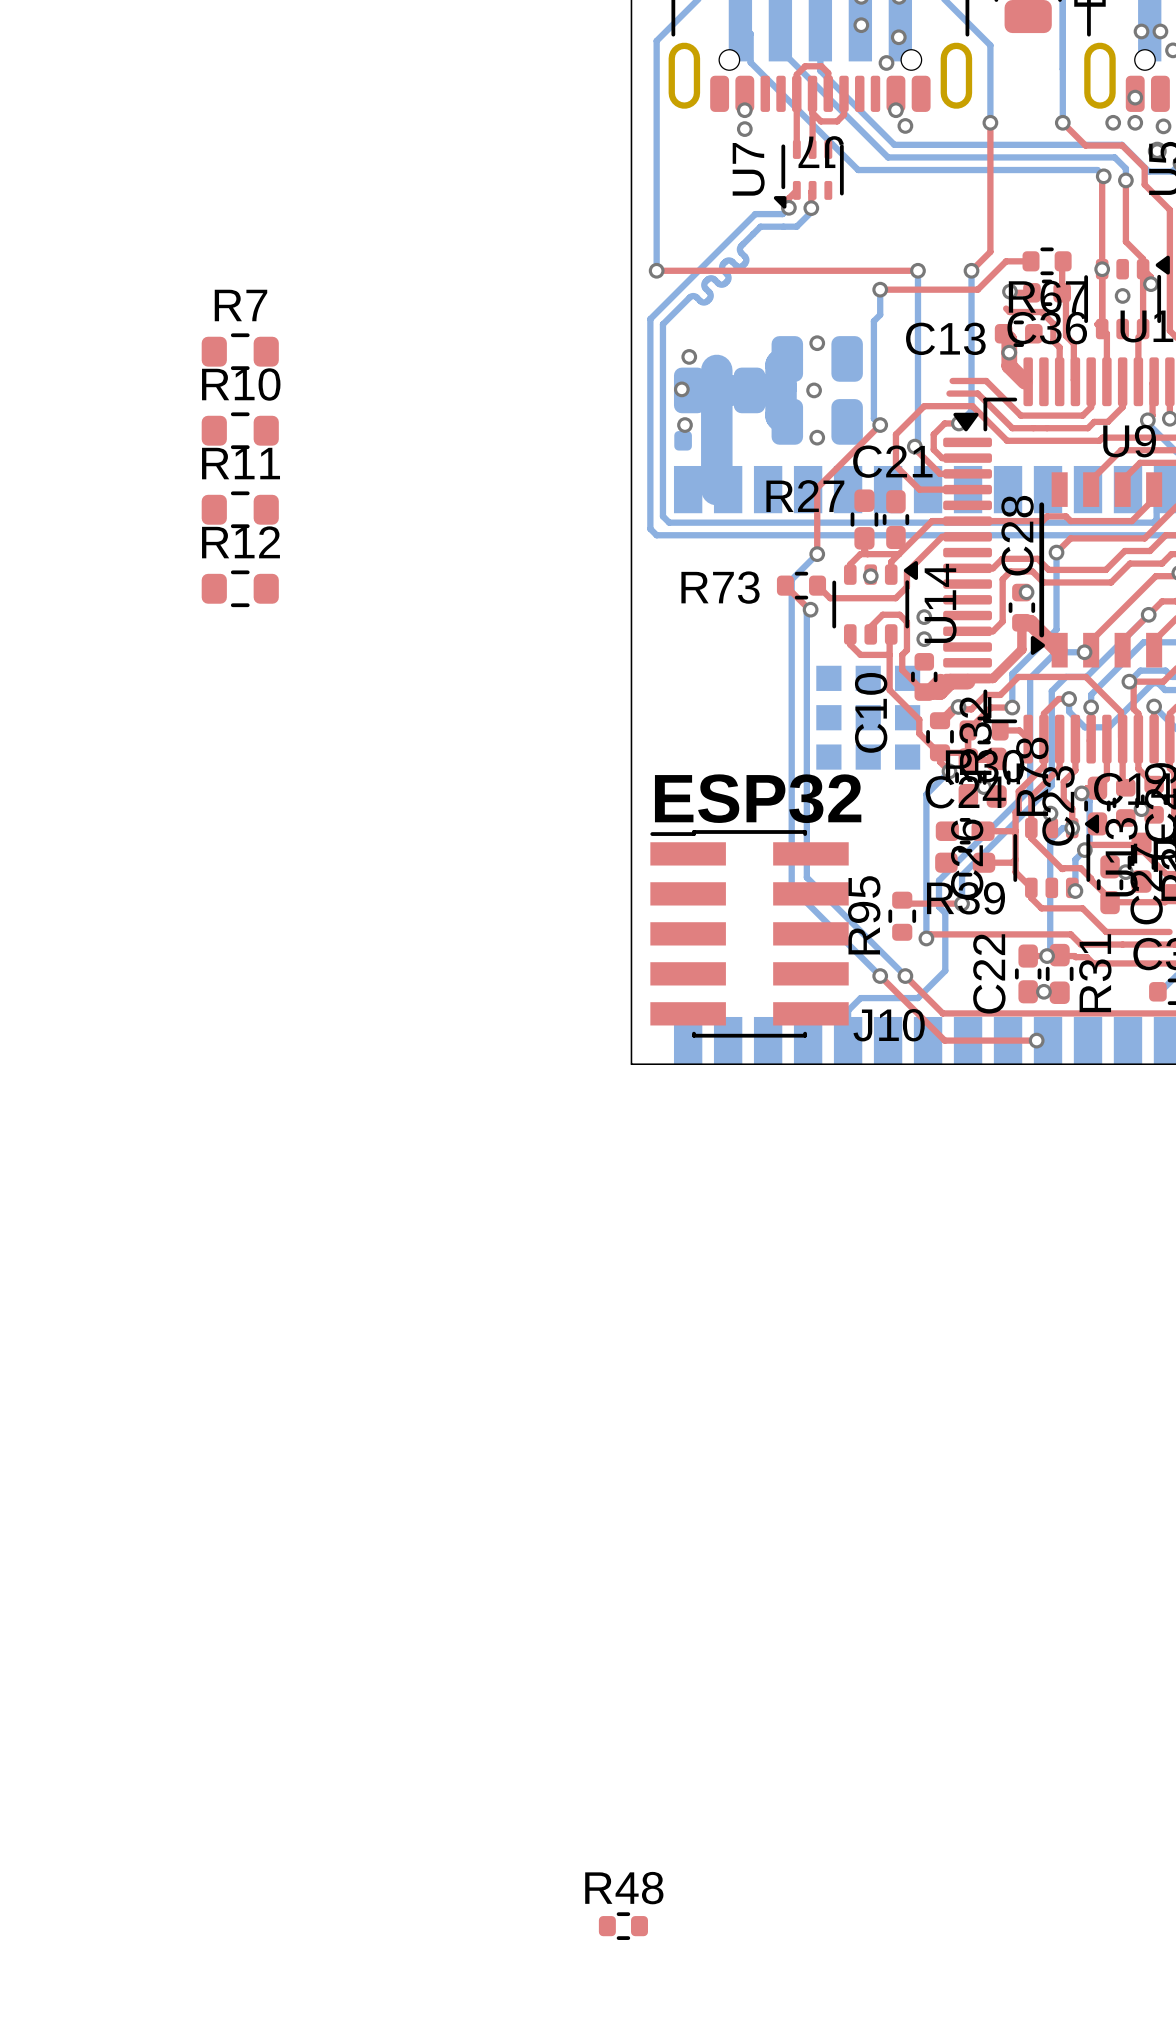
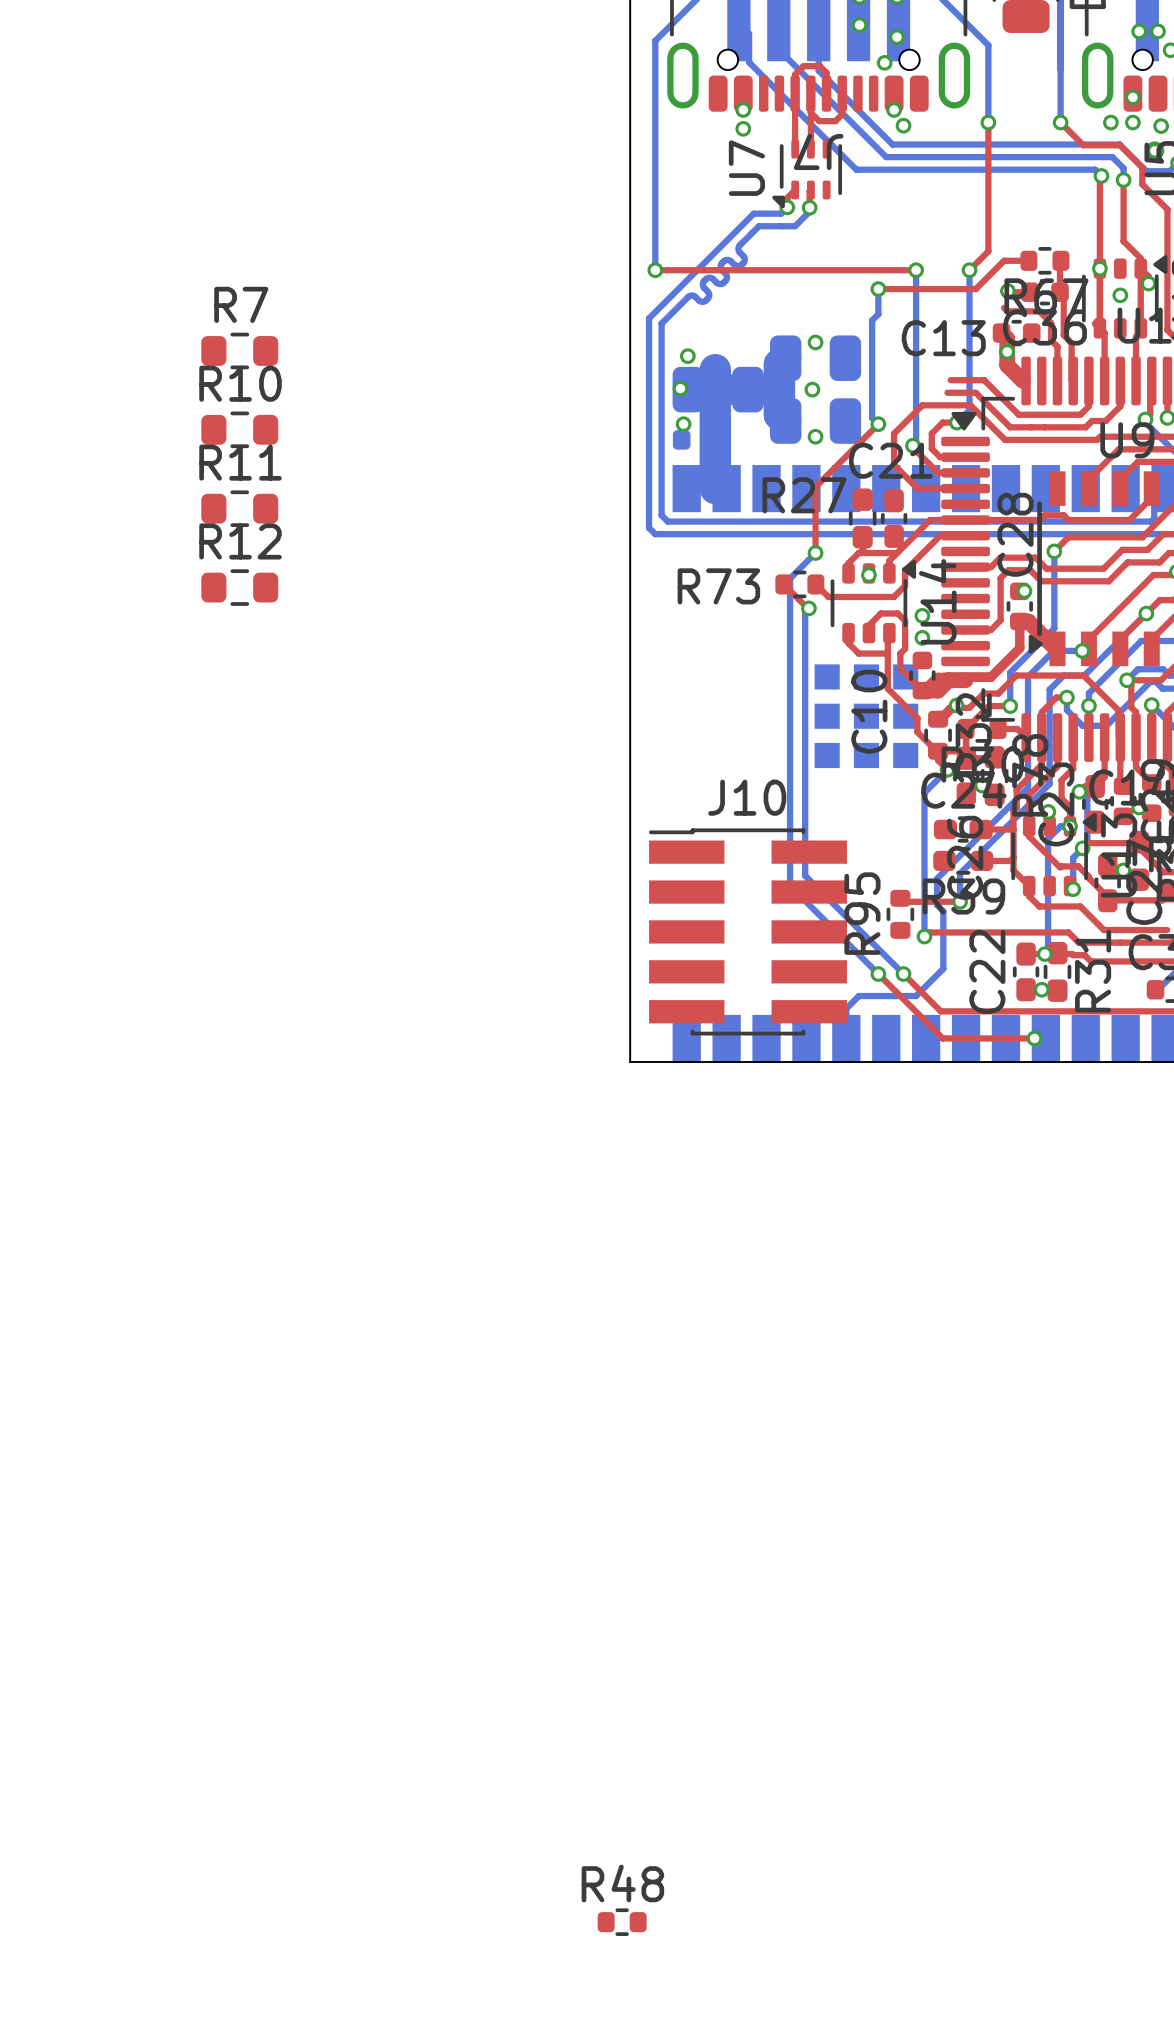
text: ESP32 (758, 798) -> none
J10 name position: J10 (889, 1025) -> J10 (747, 797)

